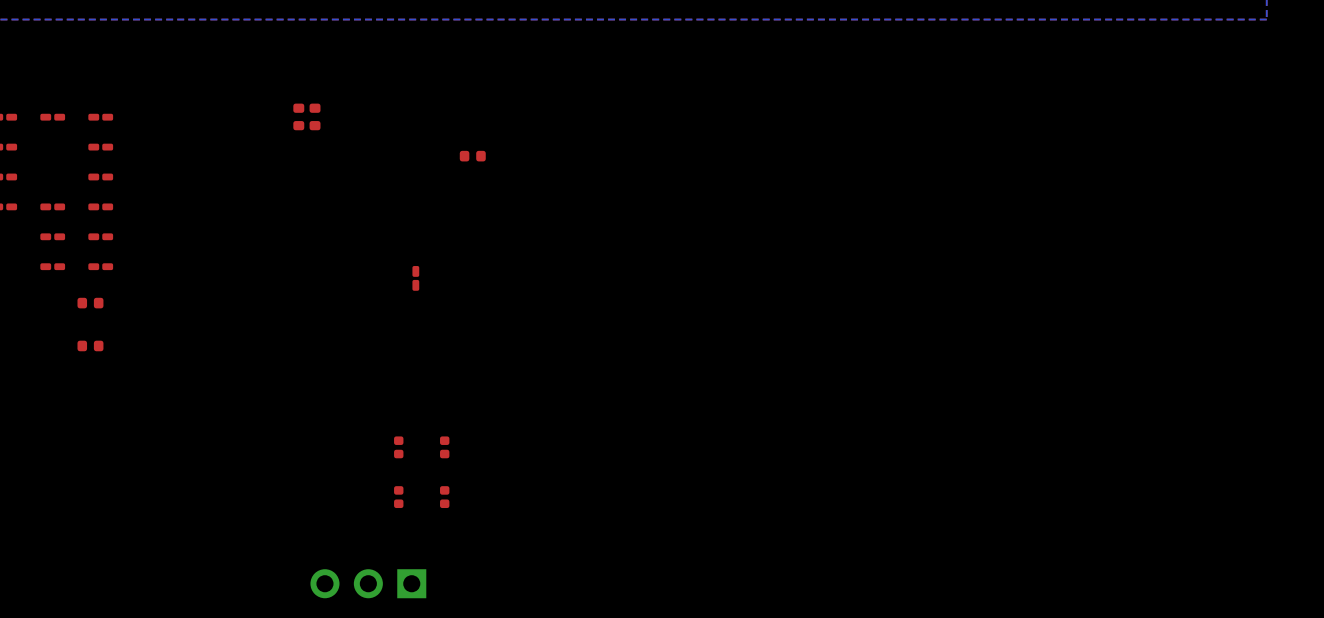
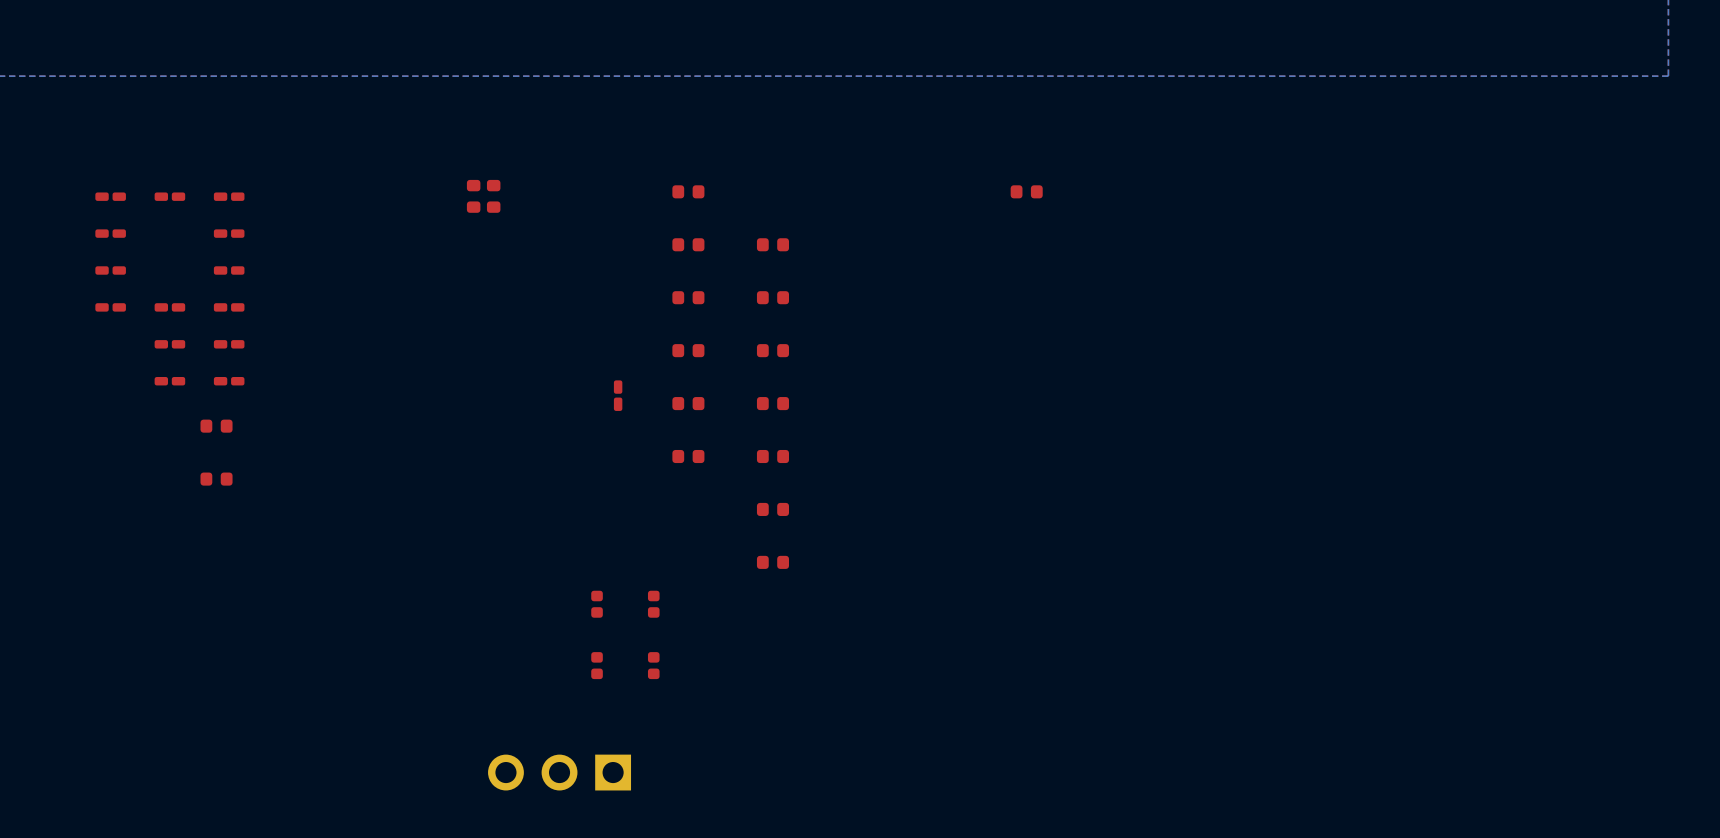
part: none -> (688, 191)
part: none -> (1026, 191)
part: none -> (772, 244)
part: none -> (688, 297)
part: none -> (772, 297)
part: none -> (688, 350)
part: none -> (772, 350)
part: none -> (688, 403)
part: none -> (772, 403)
part: none -> (688, 456)
part: none -> (772, 456)
part: none -> (772, 509)
part: none -> (772, 562)

